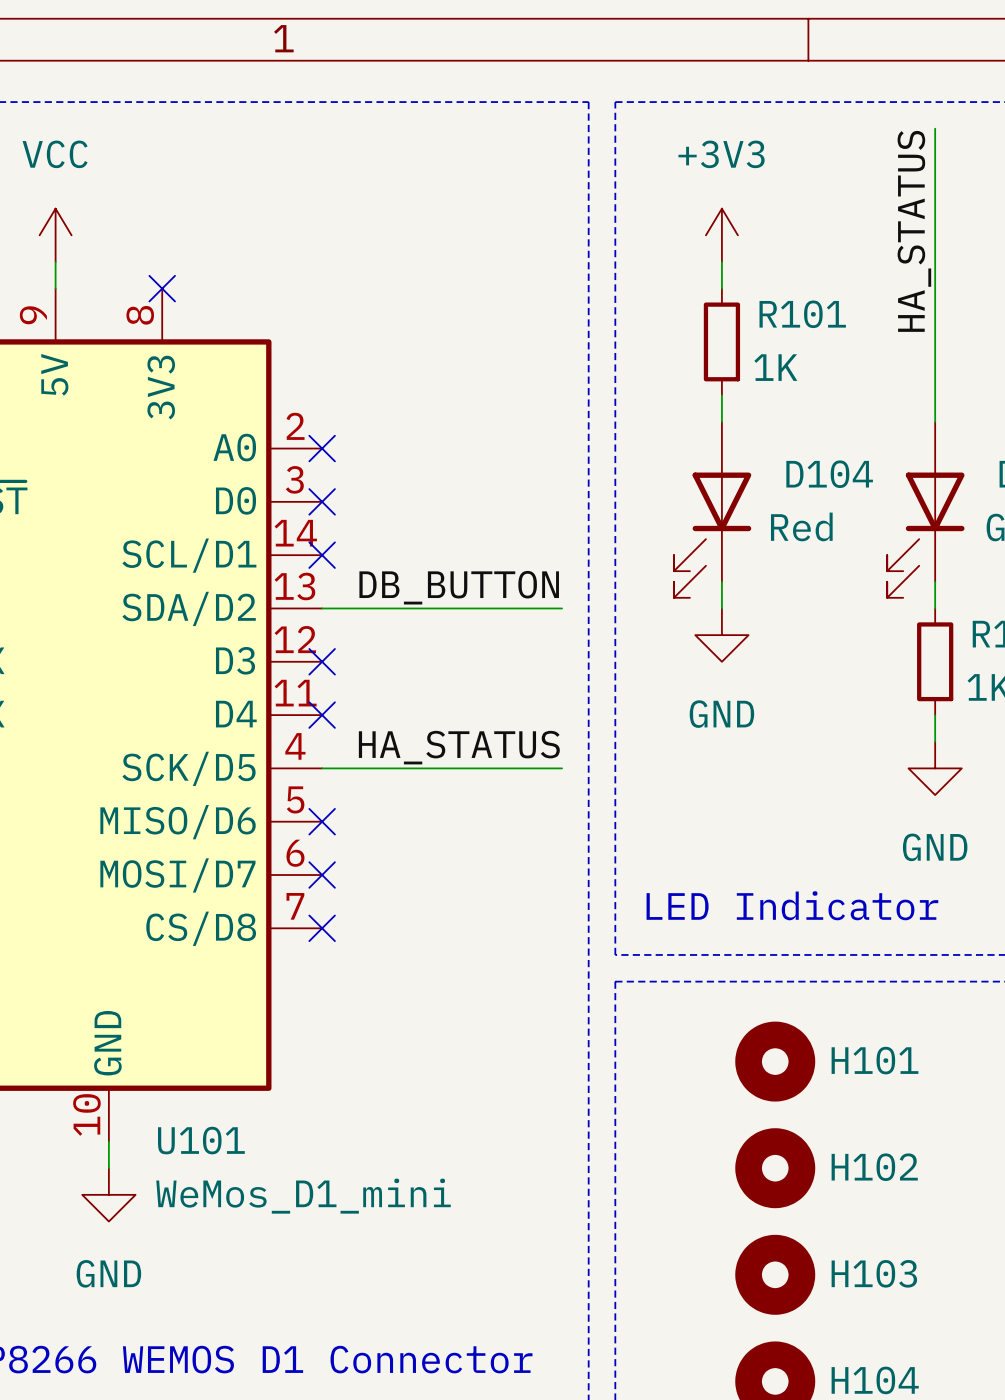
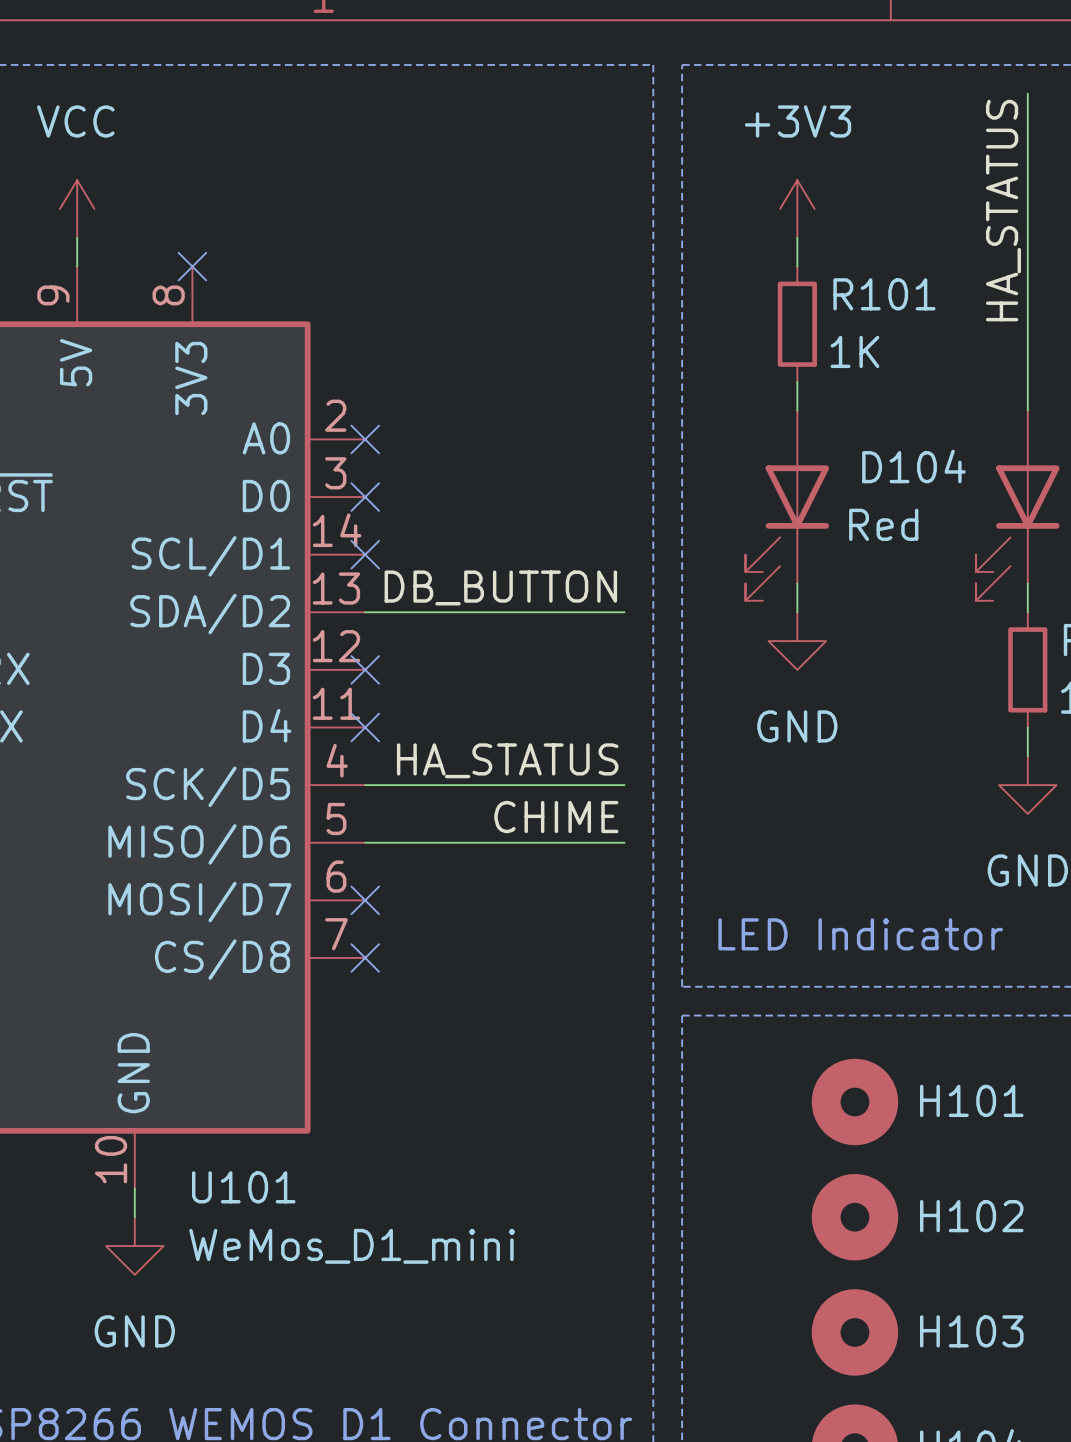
label: none -> CHIME (556, 817)
wire: none -> (365, 842) (624, 842)
no-connect mark: (322, 821) -> none

